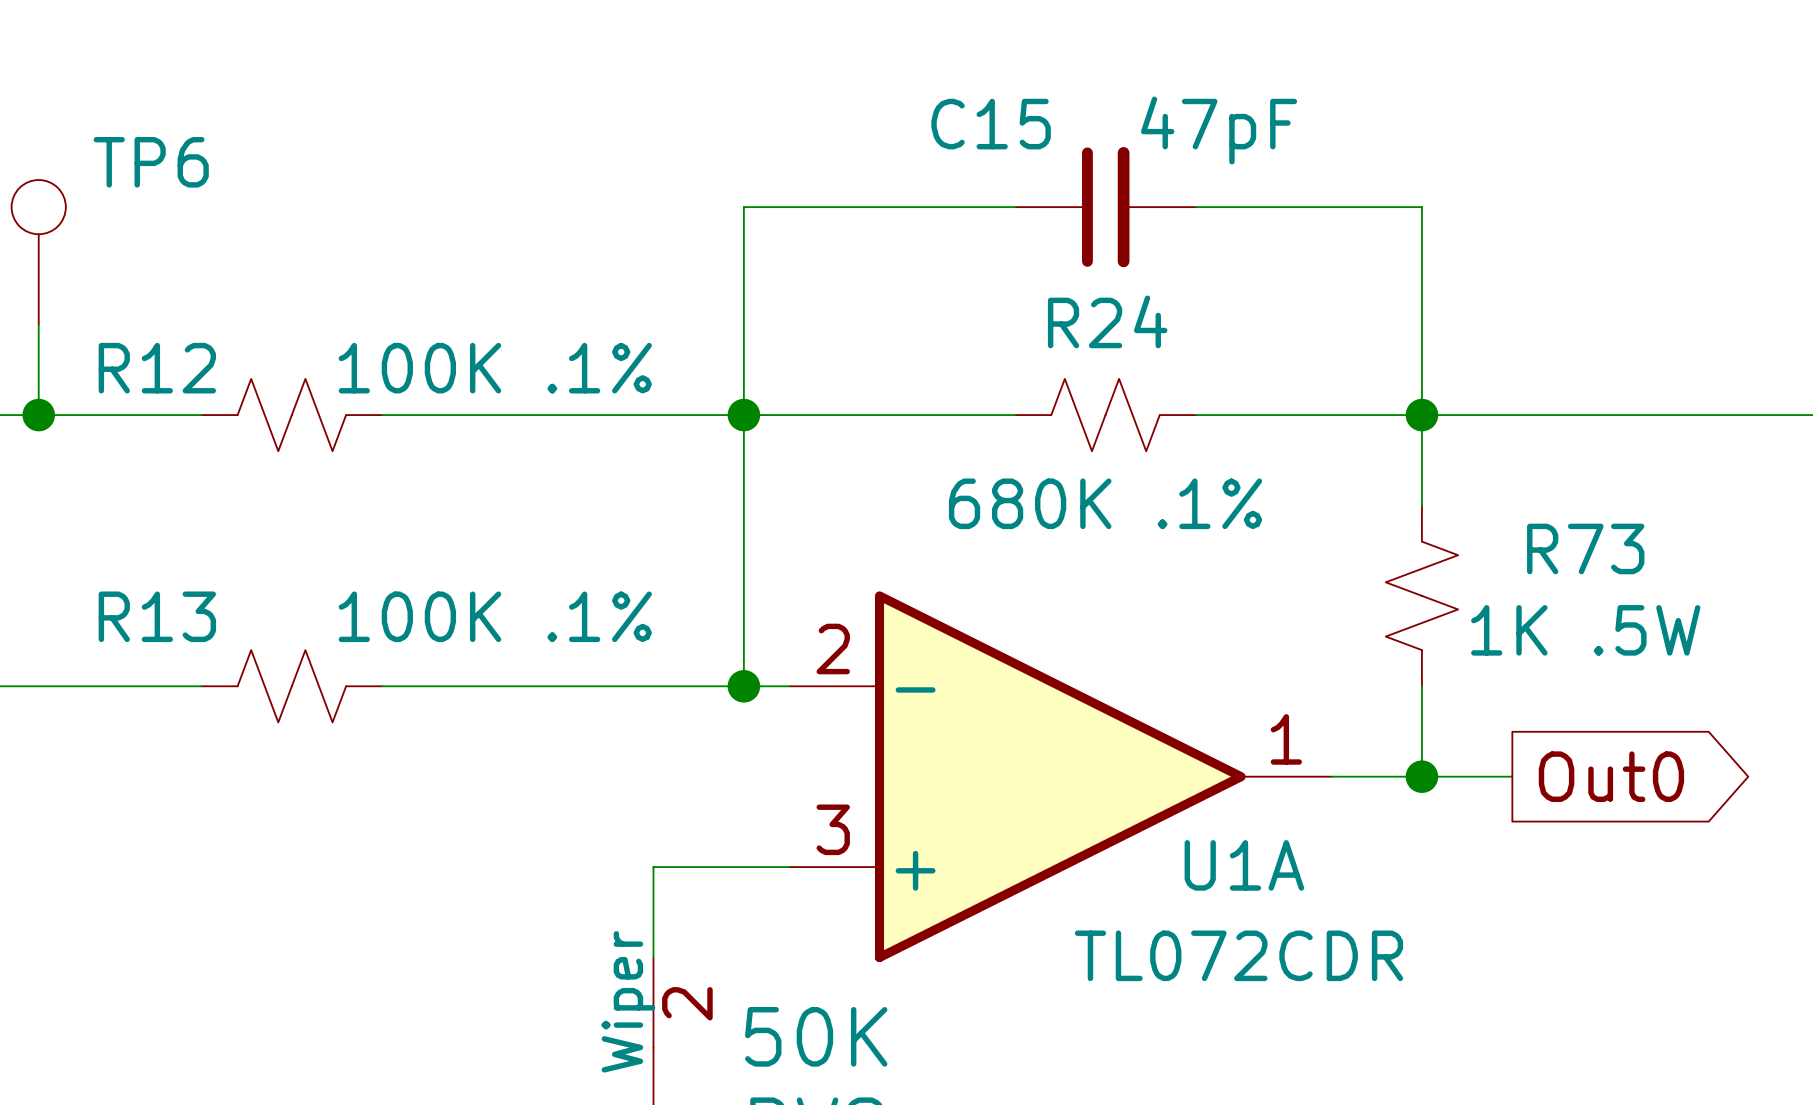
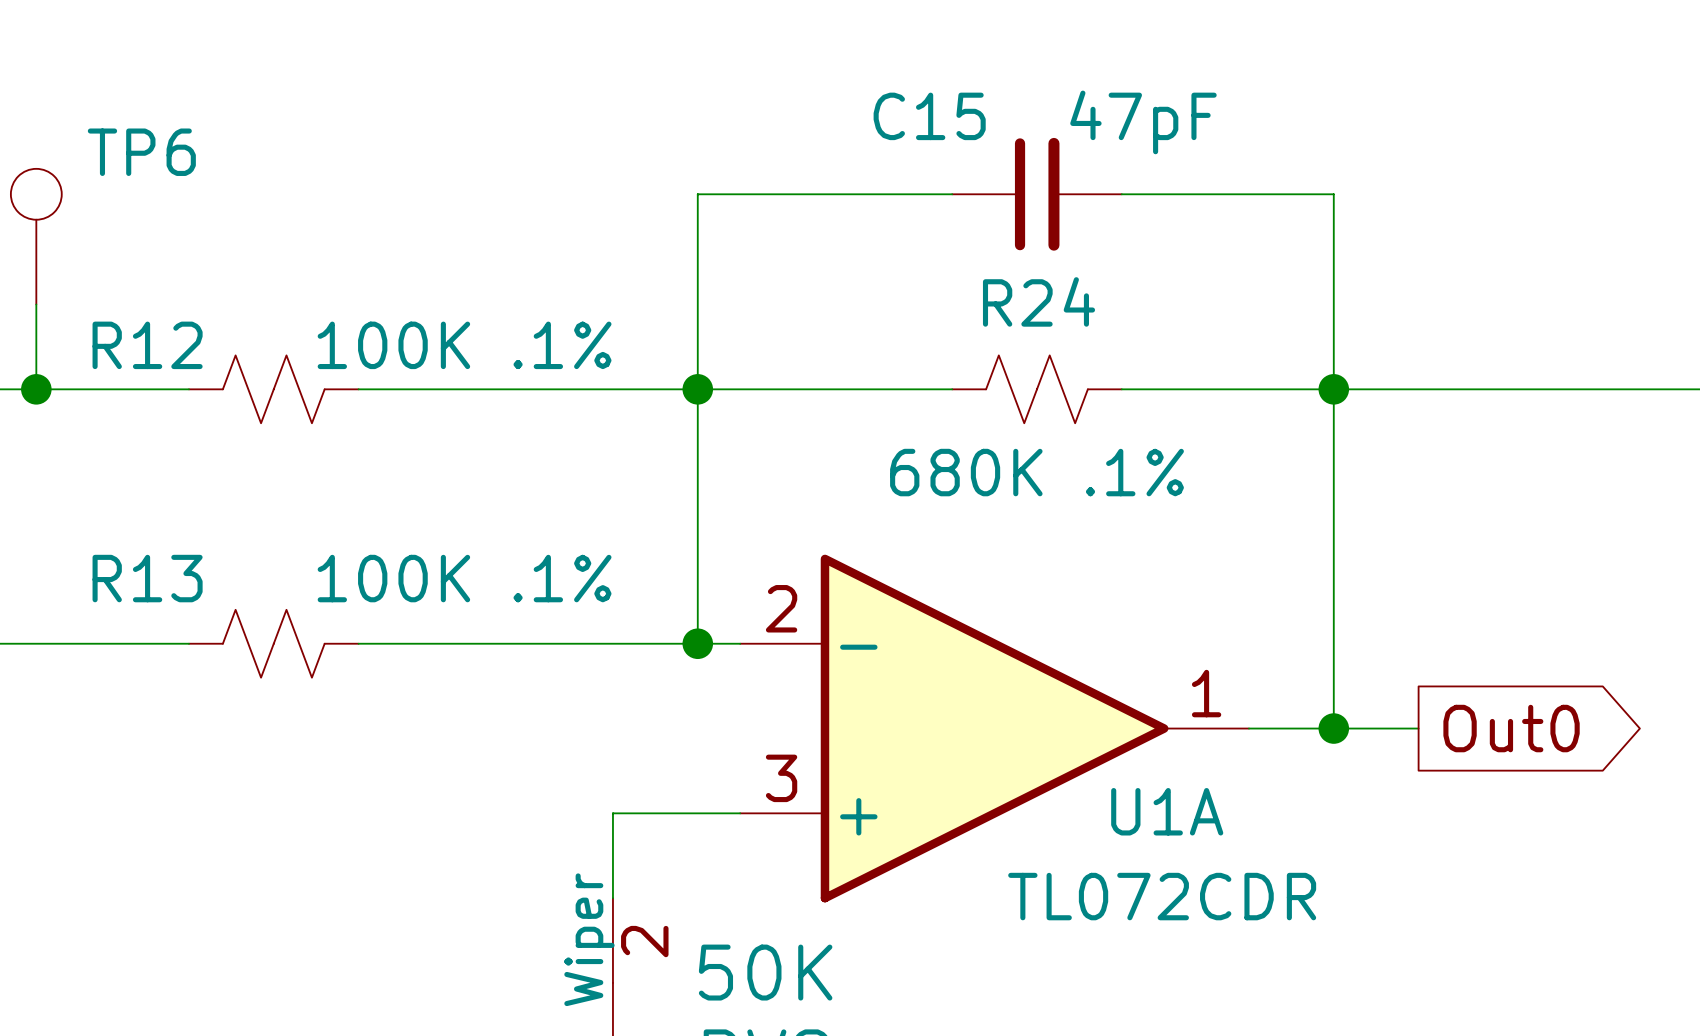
wire: none -> (1333, 474) (1333, 643)
R73: 1K .5W (1421, 595) -> none

